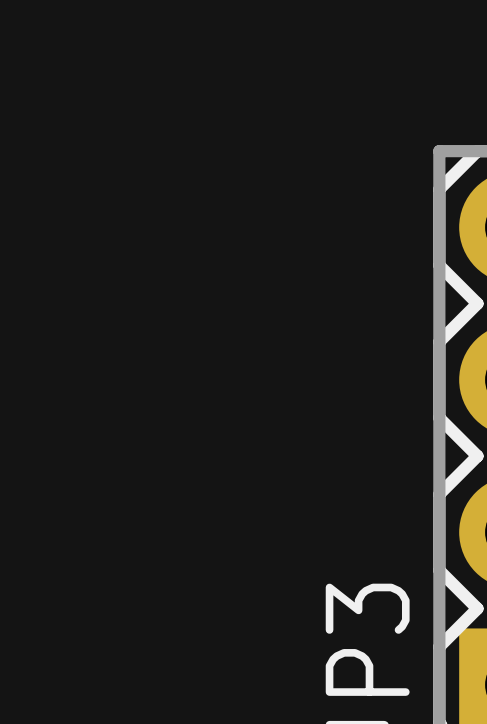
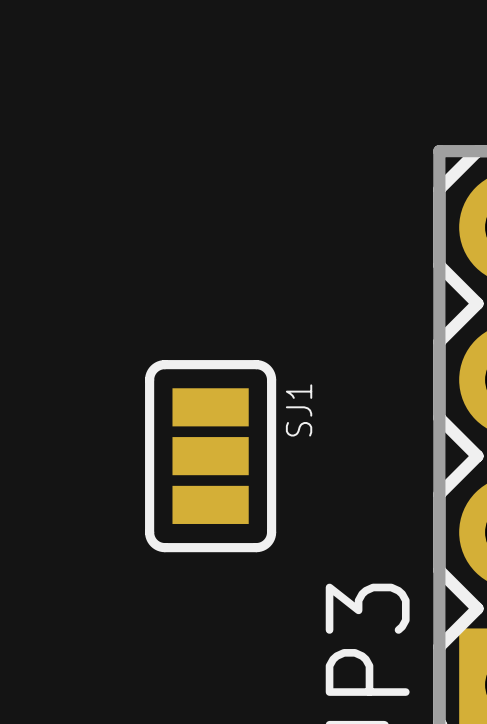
SJ1: none -> (210, 456)

